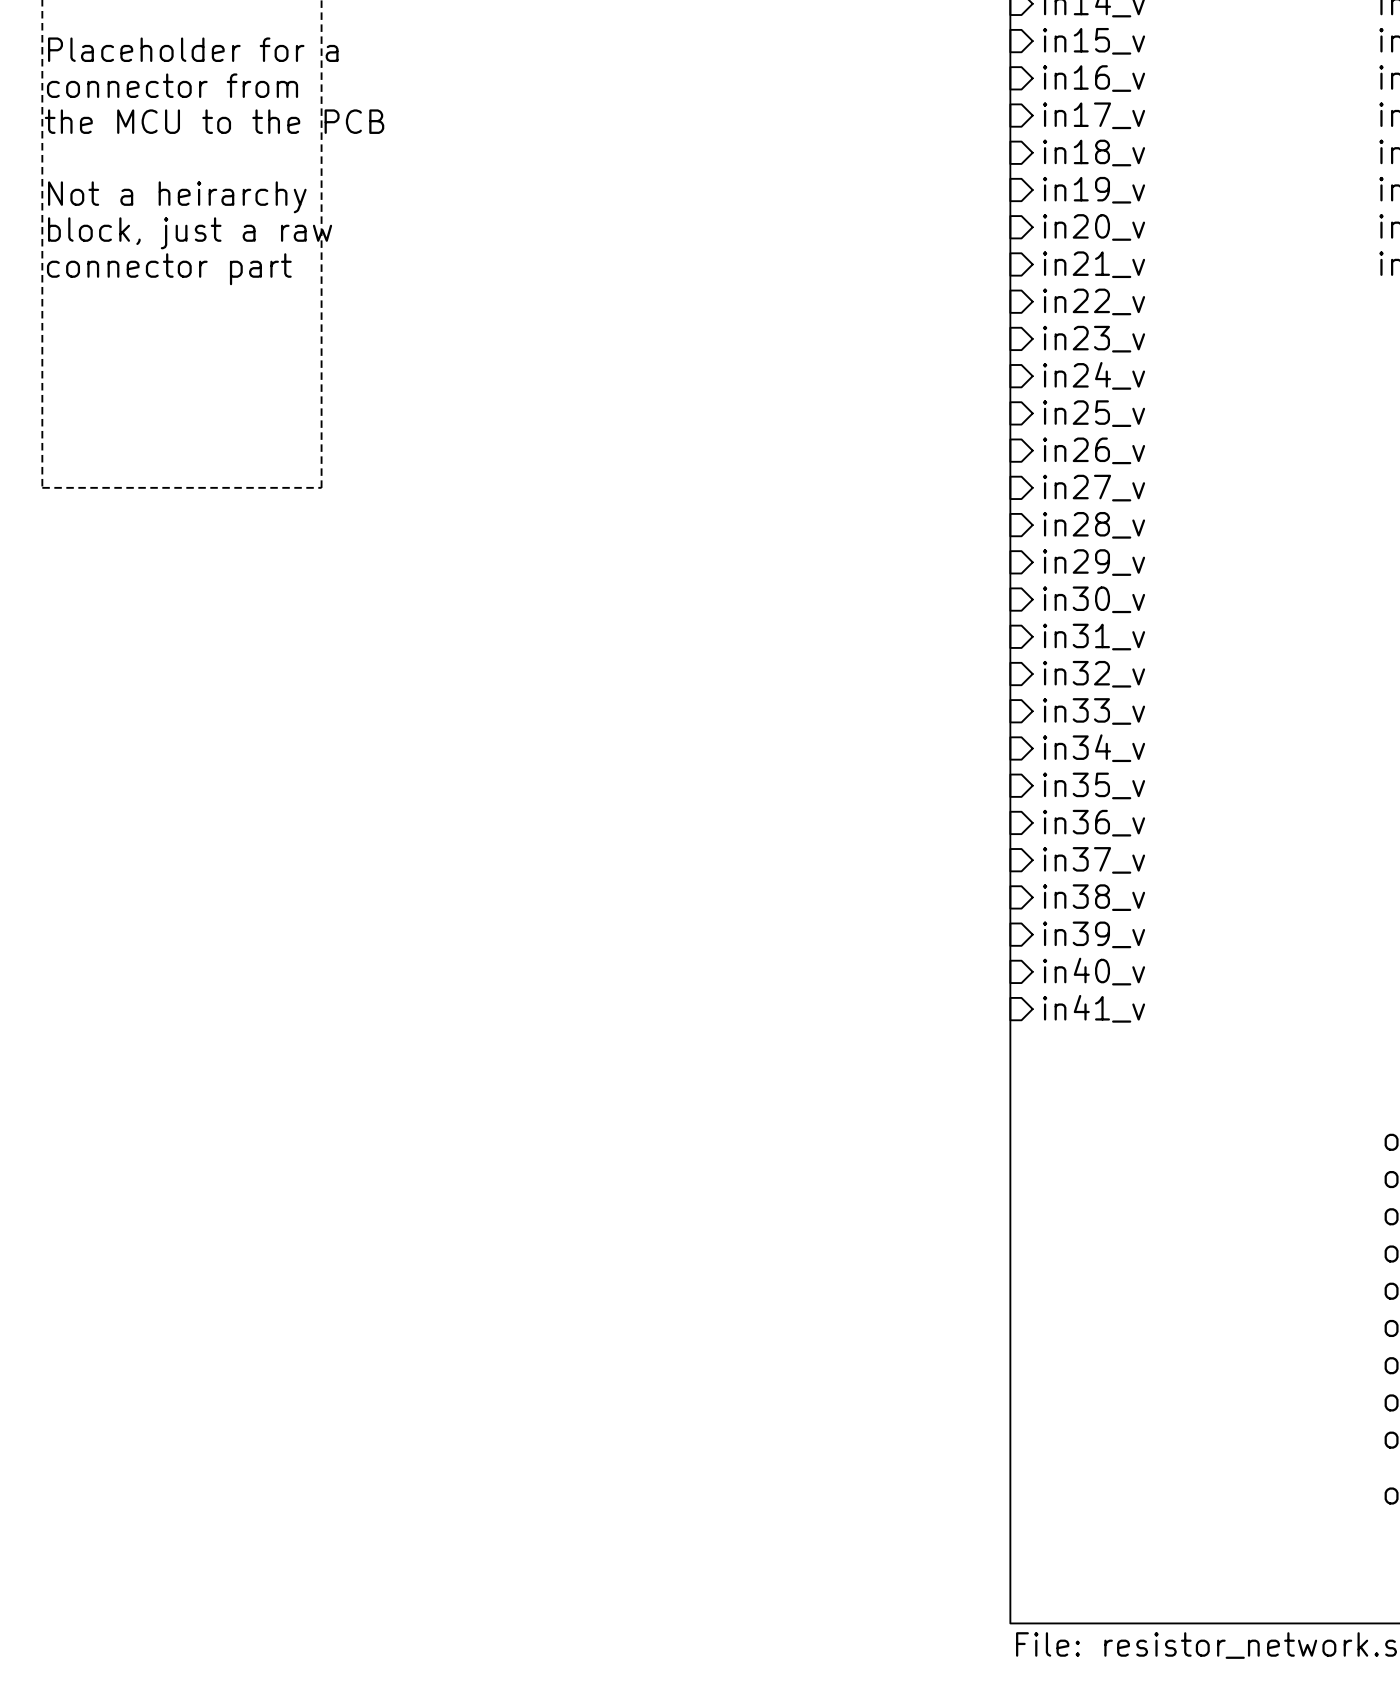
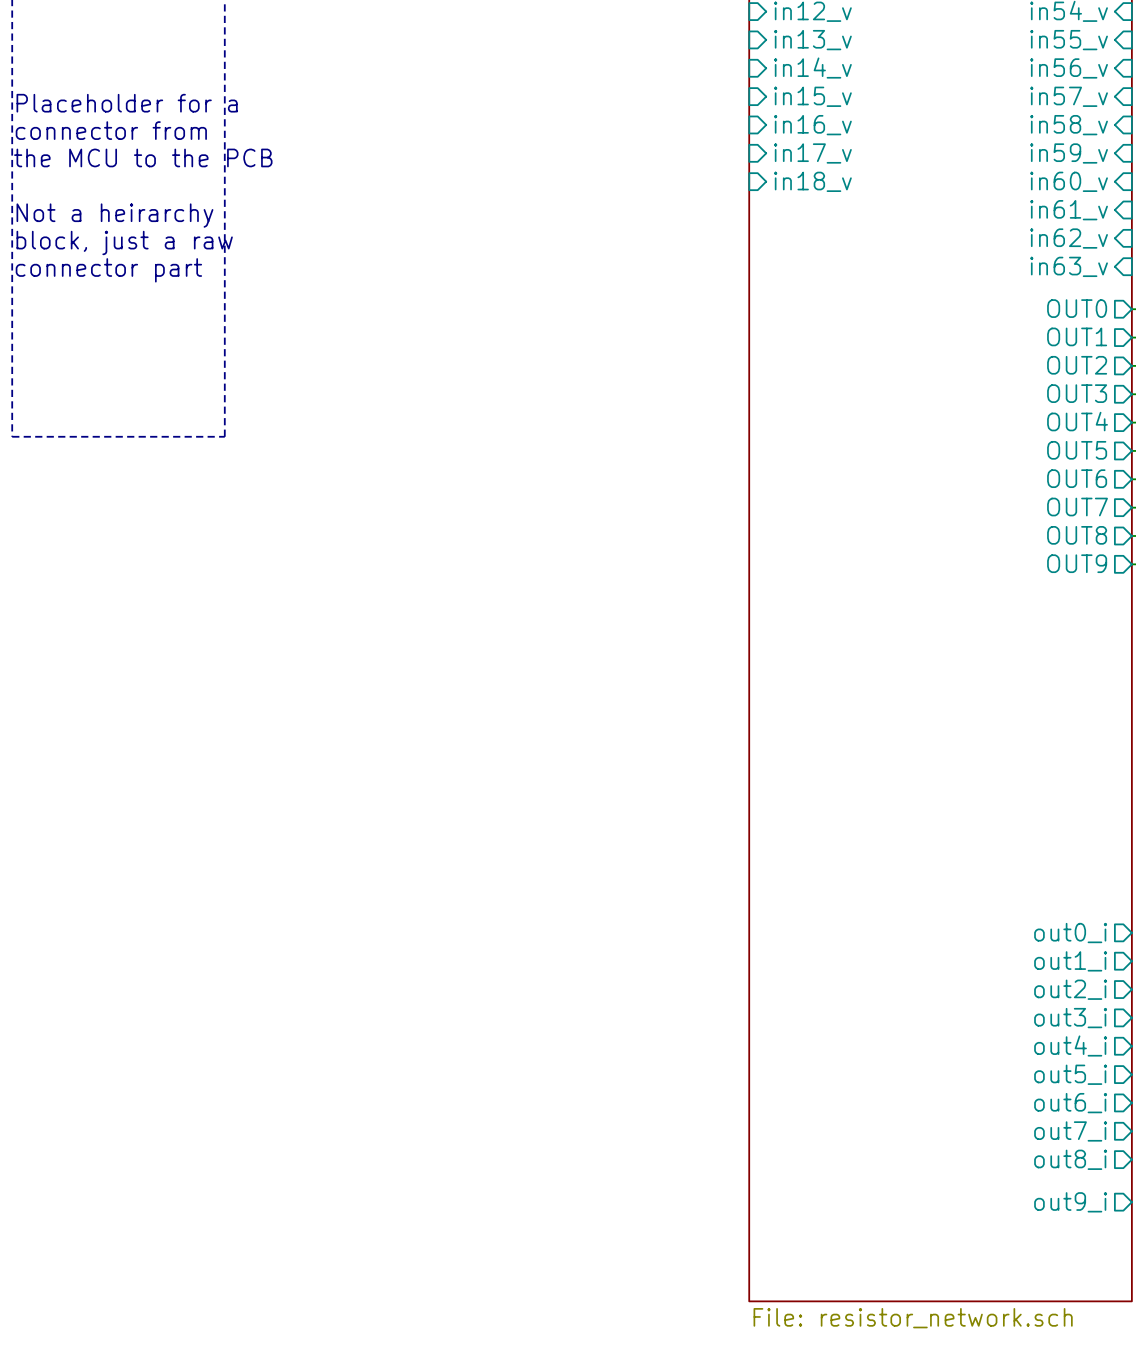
sheet pin: in19_v (1094, 190) -> none
sheet pin: in20_v (1094, 227) -> none
sheet pin: in21_v (1094, 264) -> none
sheet pin: in22_v (1094, 301) -> none
sheet pin: in23_v (1094, 339) -> none
sheet pin: in24_v (1094, 375) -> none
sheet pin: in25_v (1094, 413) -> none
sheet pin: in26_v (1094, 450) -> none
sheet pin: in27_v (1094, 488) -> none
sheet pin: in28_v (1094, 525) -> none
sheet pin: in29_v (1094, 562) -> none
sheet pin: in30_v (1094, 599) -> none
sheet pin: in31_v (1094, 637) -> none
sheet pin: in32_v (1094, 674) -> none
sheet pin: in33_v (1094, 711) -> none
sheet pin: in34_v (1094, 748) -> none
sheet pin: in35_v (1094, 785) -> none
sheet pin: in36_v (1094, 823) -> none
sheet pin: in37_v (1094, 860) -> none
sheet pin: in38_v (1094, 897) -> none
sheet pin: in39_v (1094, 934) -> none
sheet pin: in40_v (1094, 971) -> none
sheet pin: in41_v (1094, 1008) -> none

